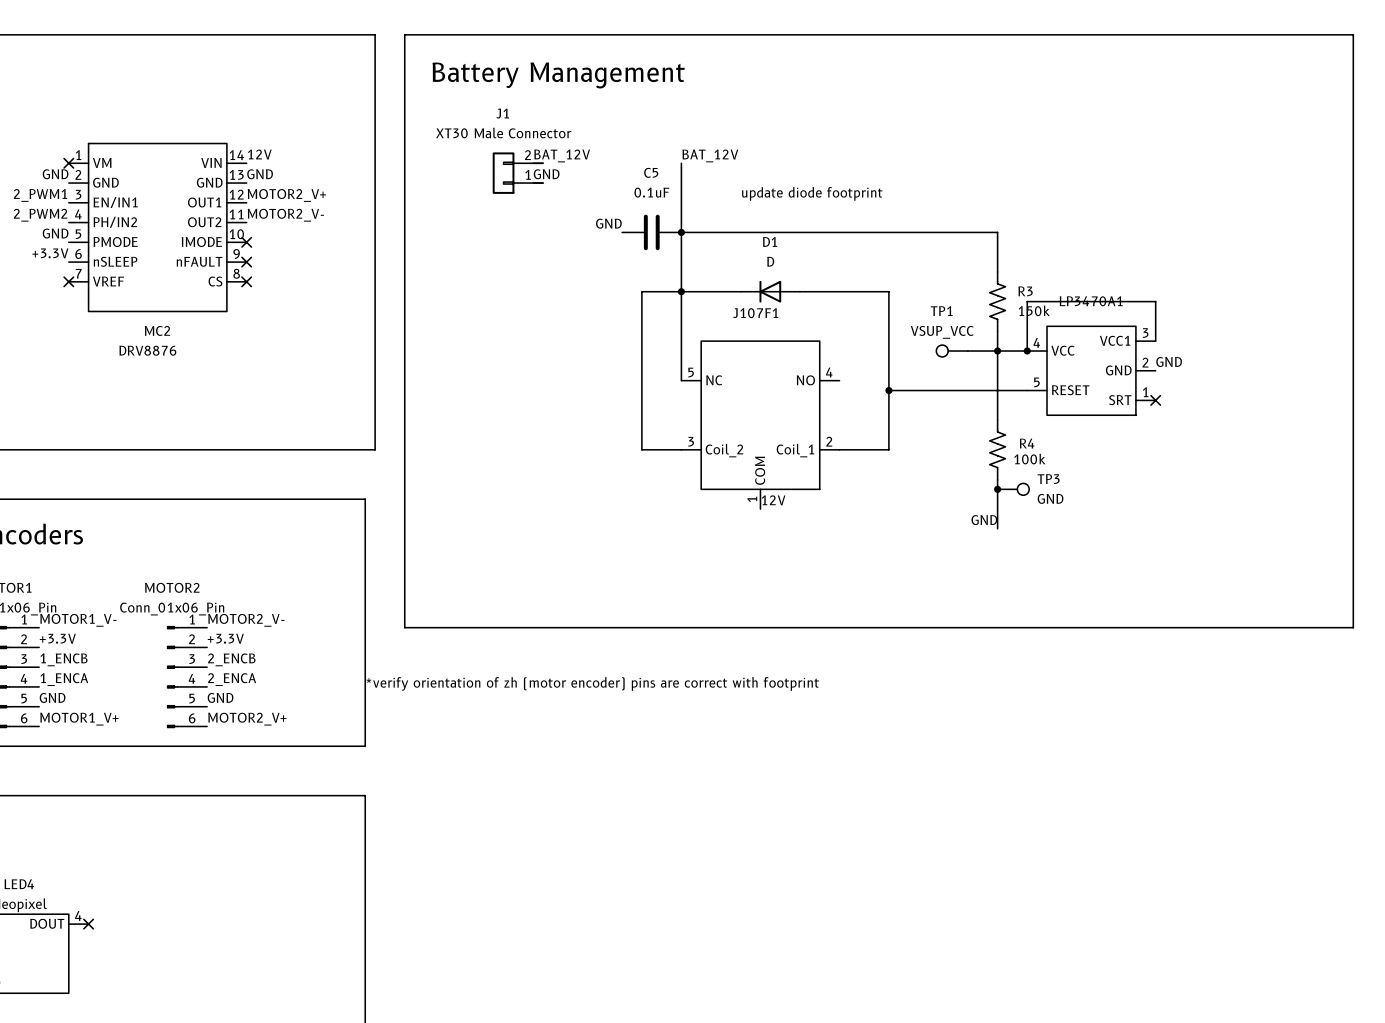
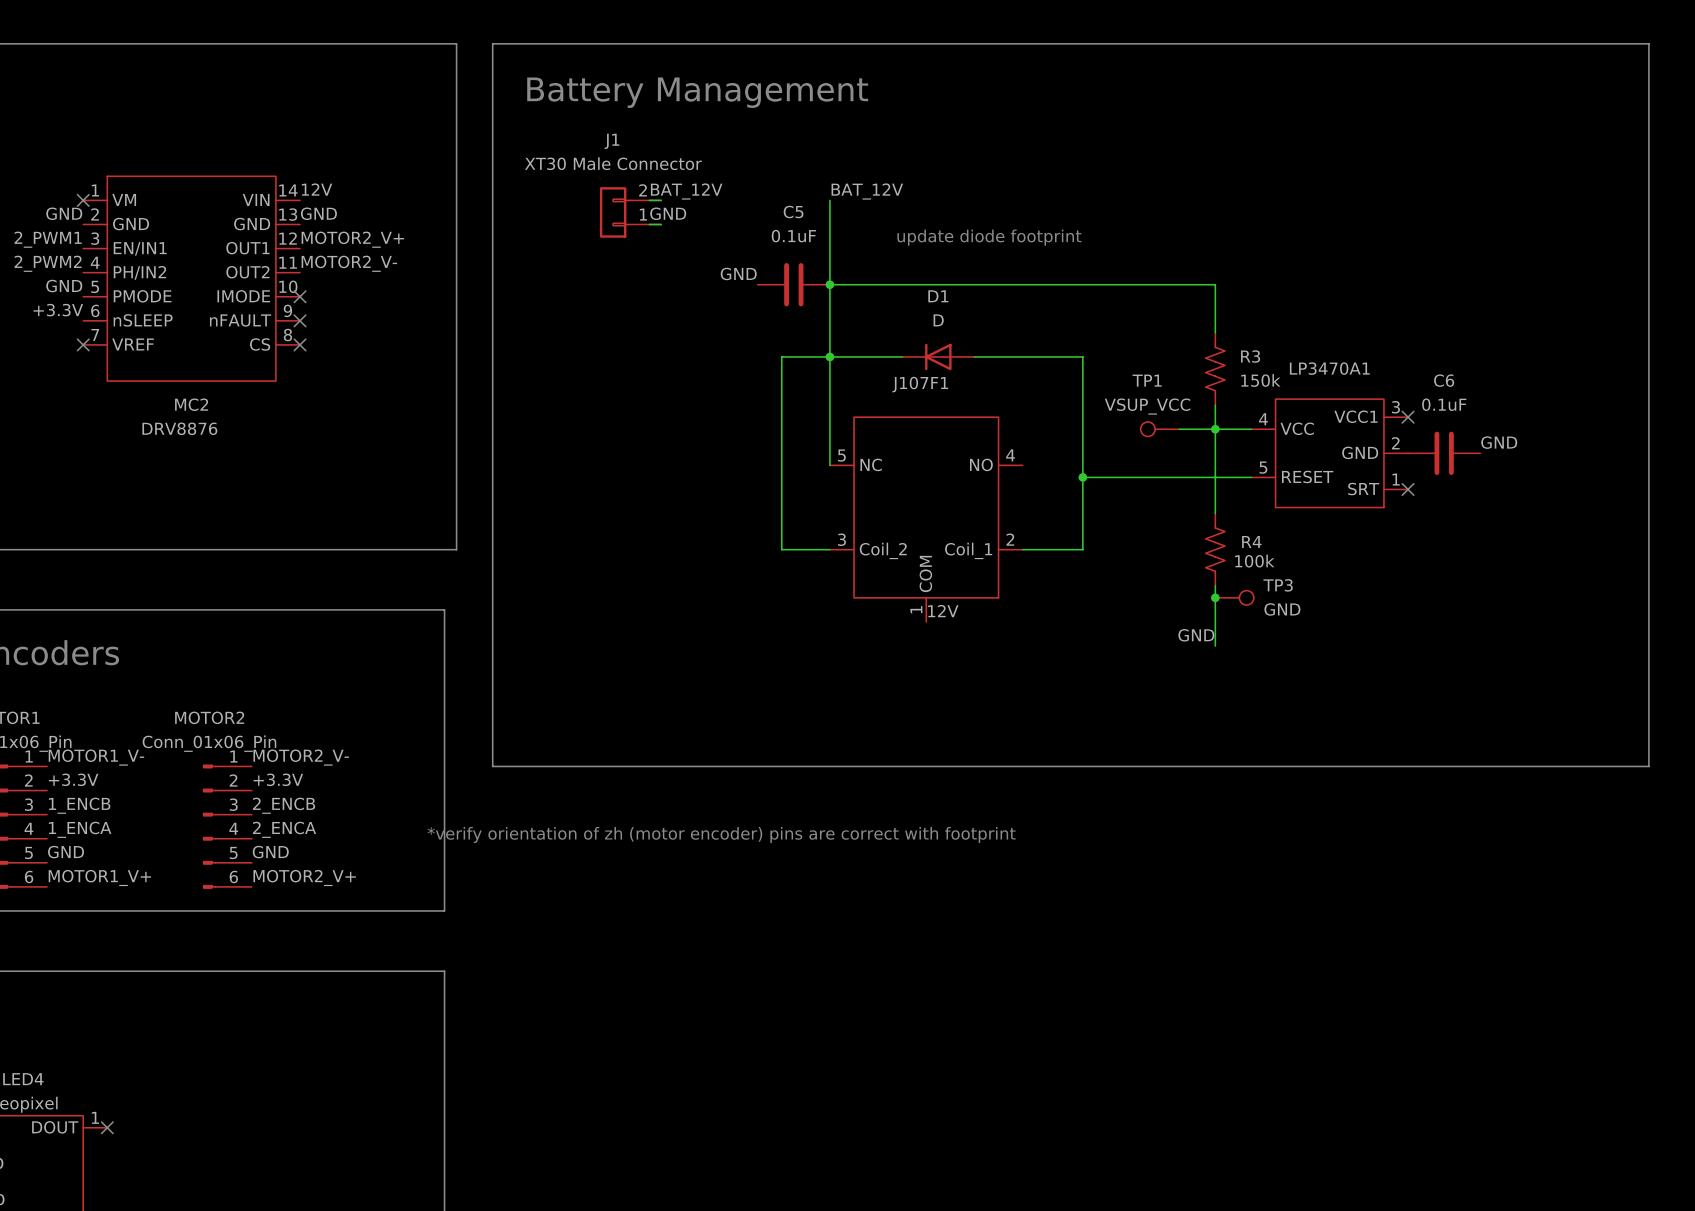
wire: (1155, 341) (1155, 301) (1027, 301) (1027, 351) -> none
no-connect mark: none -> (1408, 417)
junction: (1027, 351) -> none
label position: GND (1169, 362) -> GND (1499, 442)
C6: none -> 0.1uF (1444, 453)
LED4 pin number: 4 (78, 915) -> 1 (95, 1117)

